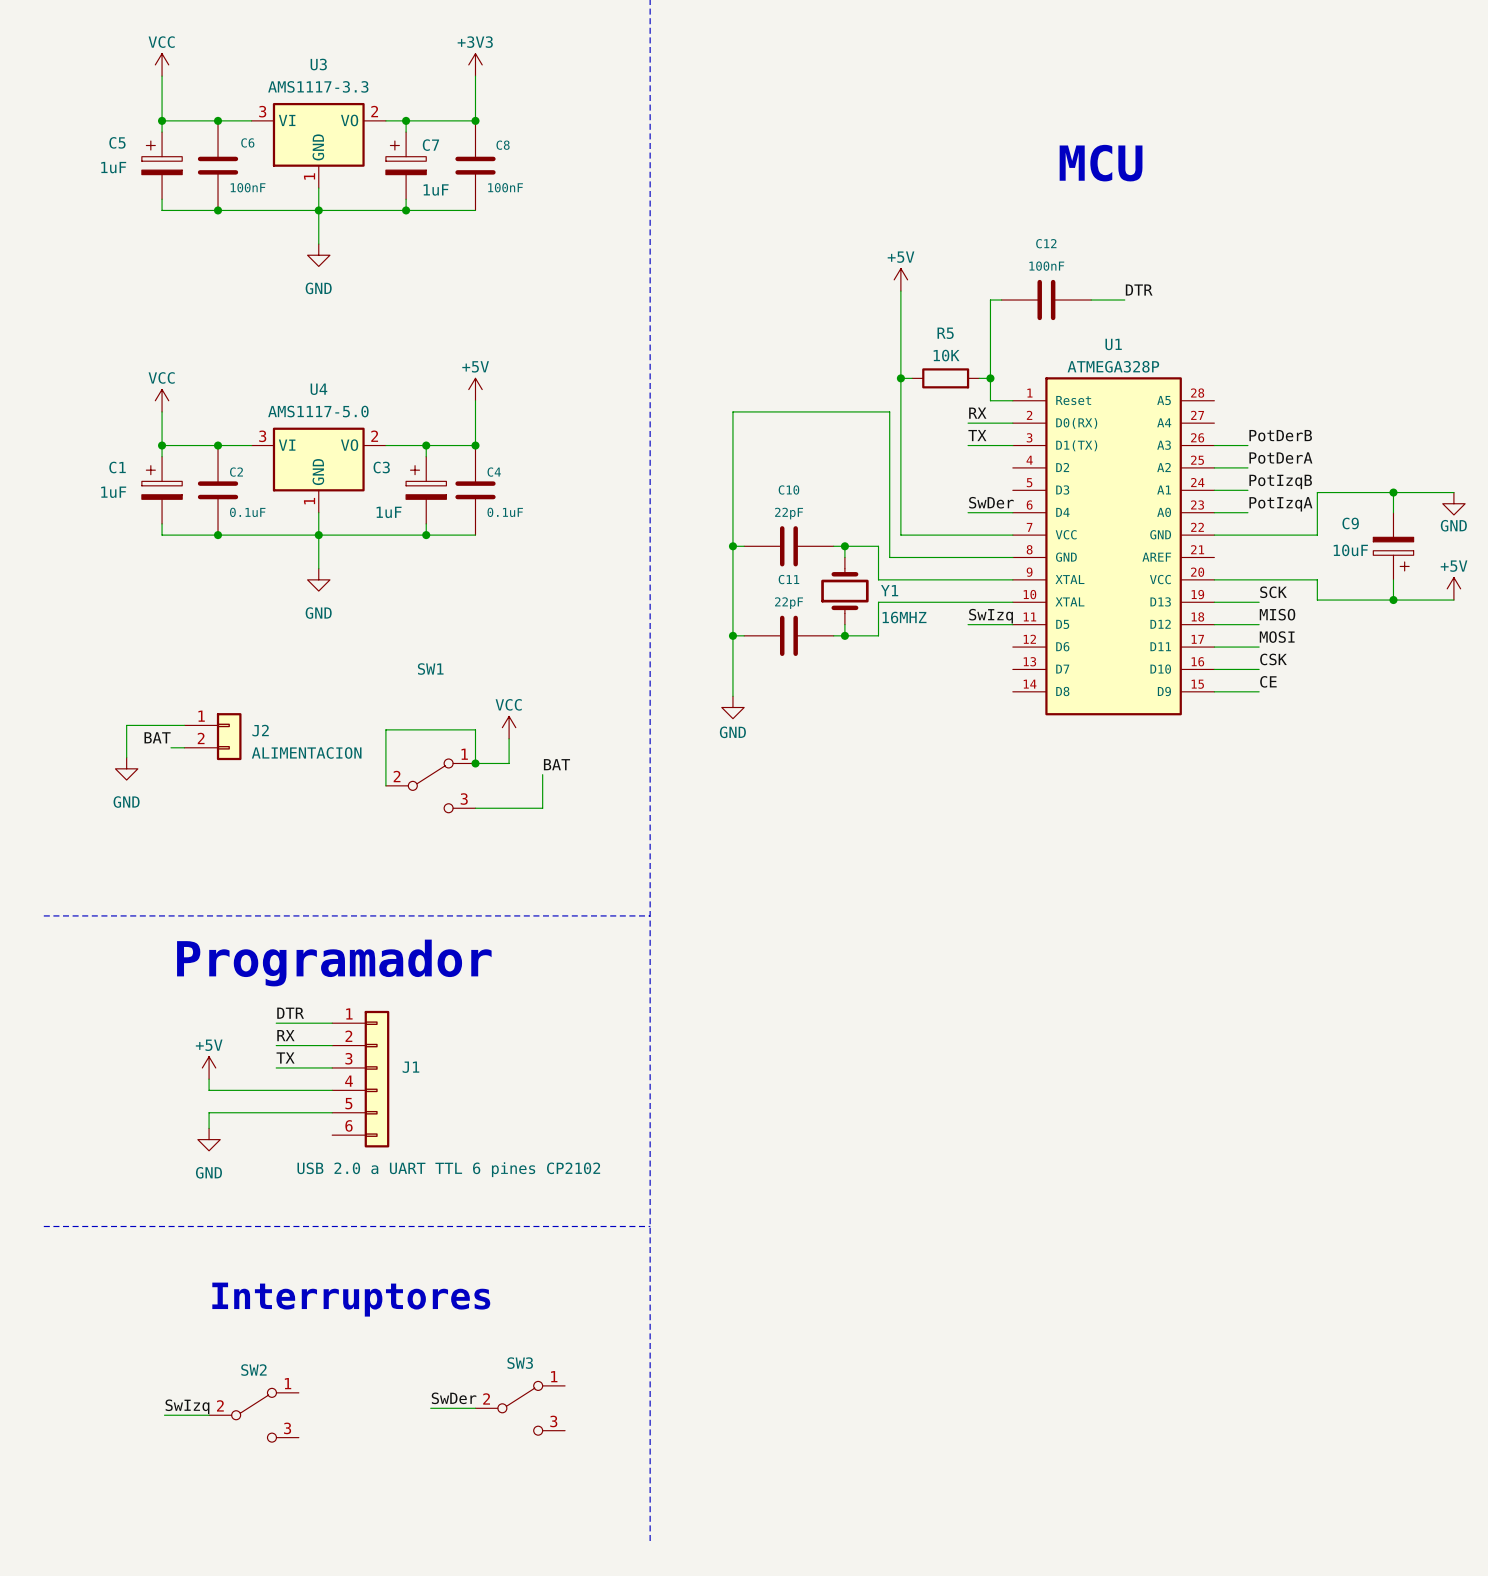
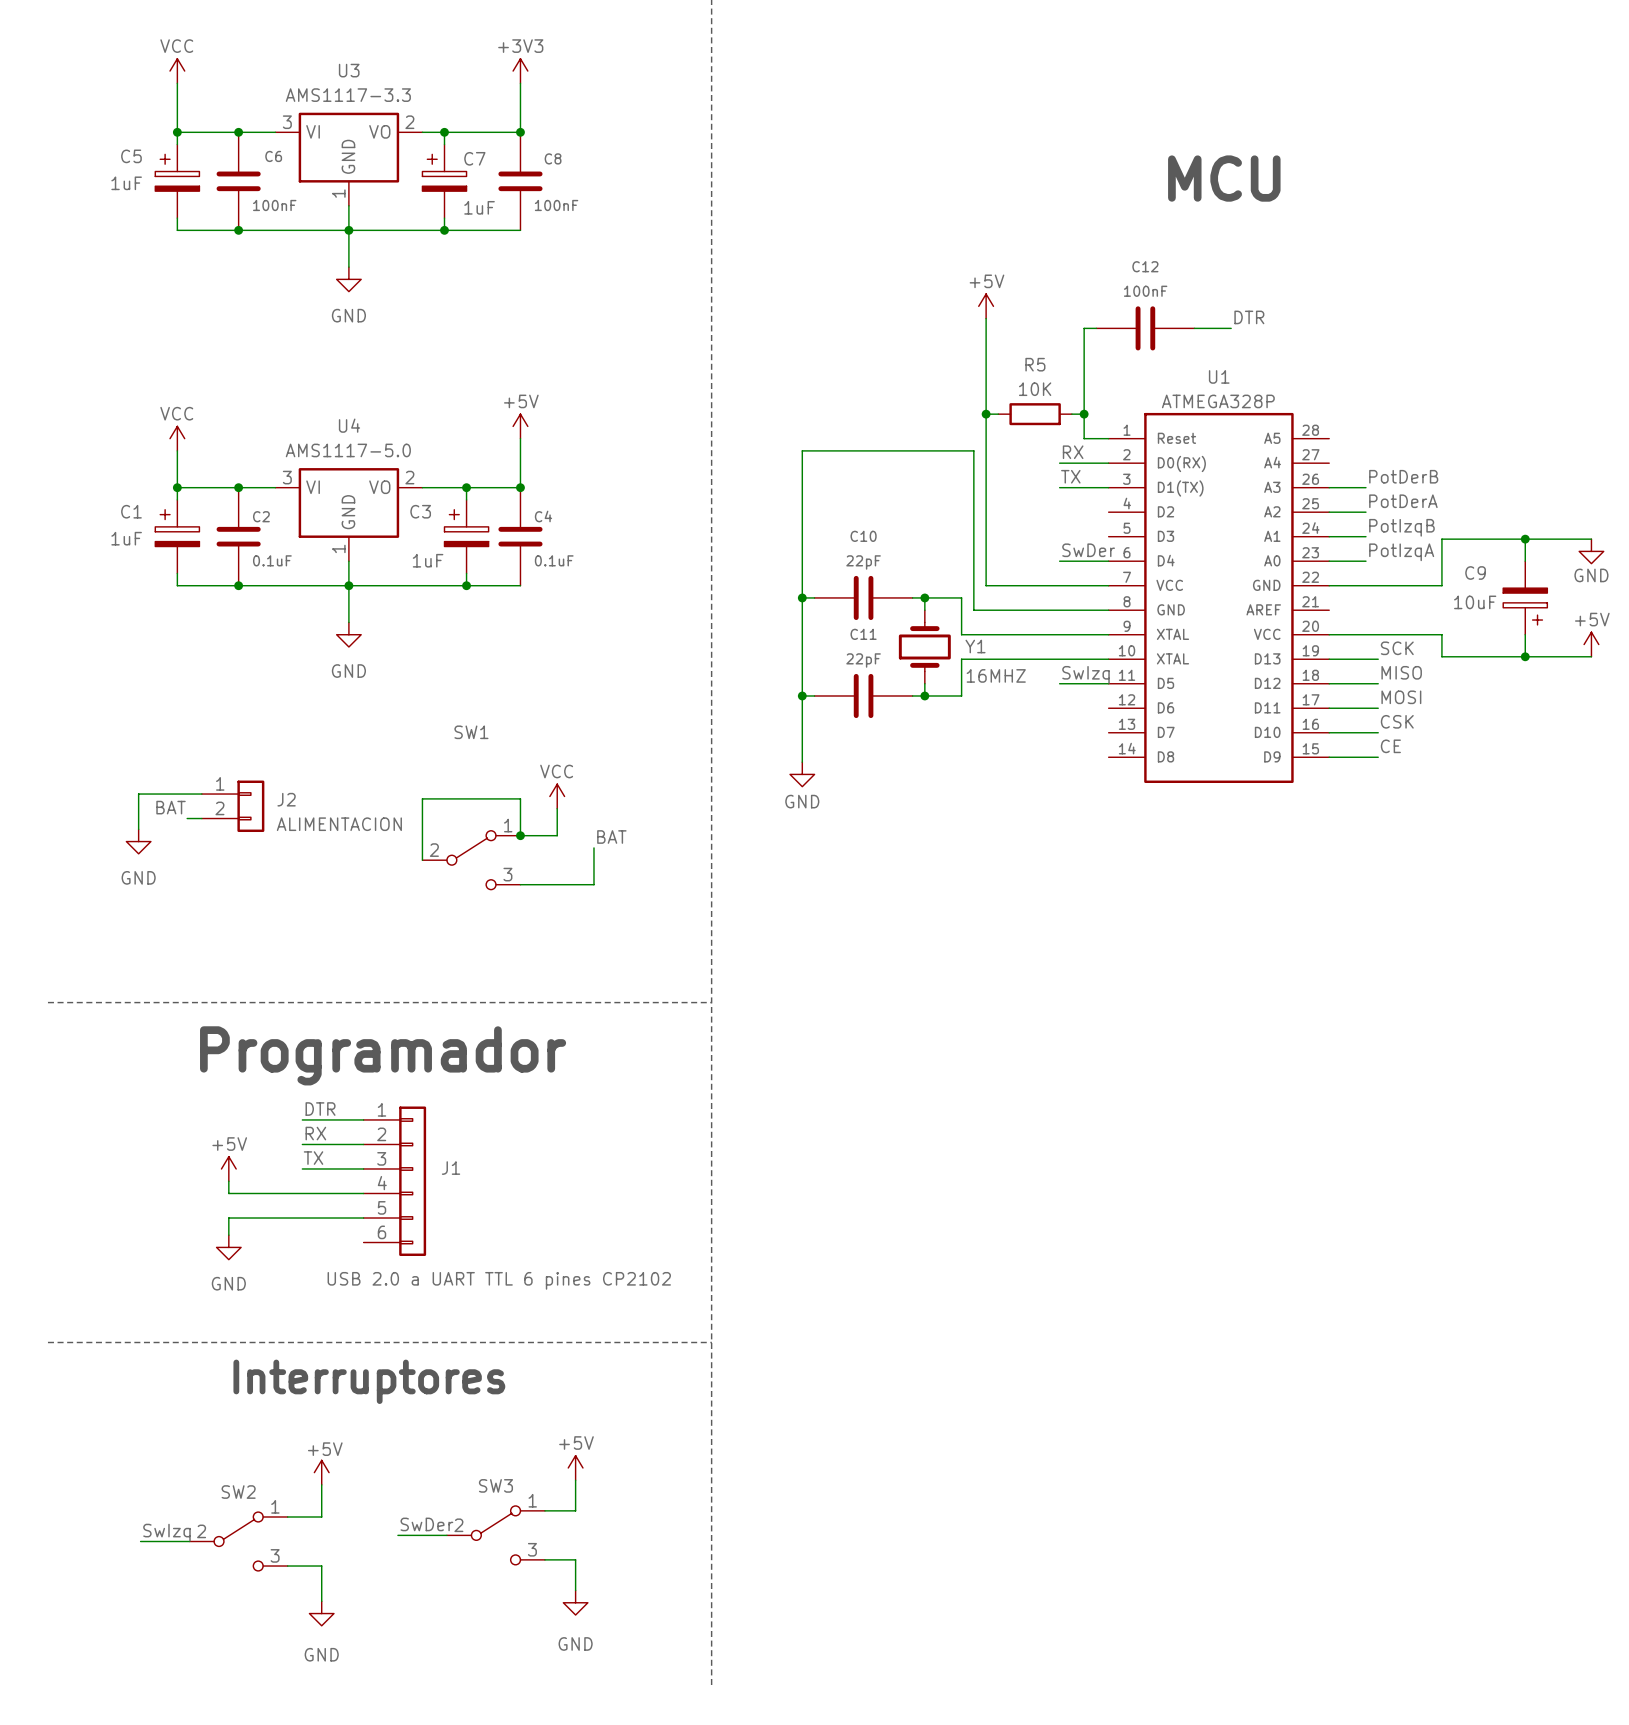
text position: Interruptores (351, 1299) -> Interruptores (369, 1381)
power symbol: none -> +5V (575, 1467)
power symbol: none -> +5V (321, 1472)
wire: none -> (575, 1480) (575, 1510) (544, 1510)
wire: none -> (321, 1484) (321, 1516) (287, 1516)
label position: SwDer (454, 1398) -> SwDer (426, 1524)
label position: SwIzq (187, 1406) -> SwIzq (166, 1532)
wire: (430, 1408) (475, 1408) -> (397, 1535) (446, 1535)
SW3 position: (520, 1408) -> (495, 1535)
wire: (164, 1415) (209, 1415) -> (140, 1541) (189, 1541)
SW2 position: (254, 1415) -> (238, 1541)
wire: none -> (544, 1559) (575, 1559) (575, 1590)
wire: none -> (287, 1566) (321, 1566) (321, 1601)
power symbol: none -> GND (575, 1602)
power symbol: none -> GND (321, 1613)

